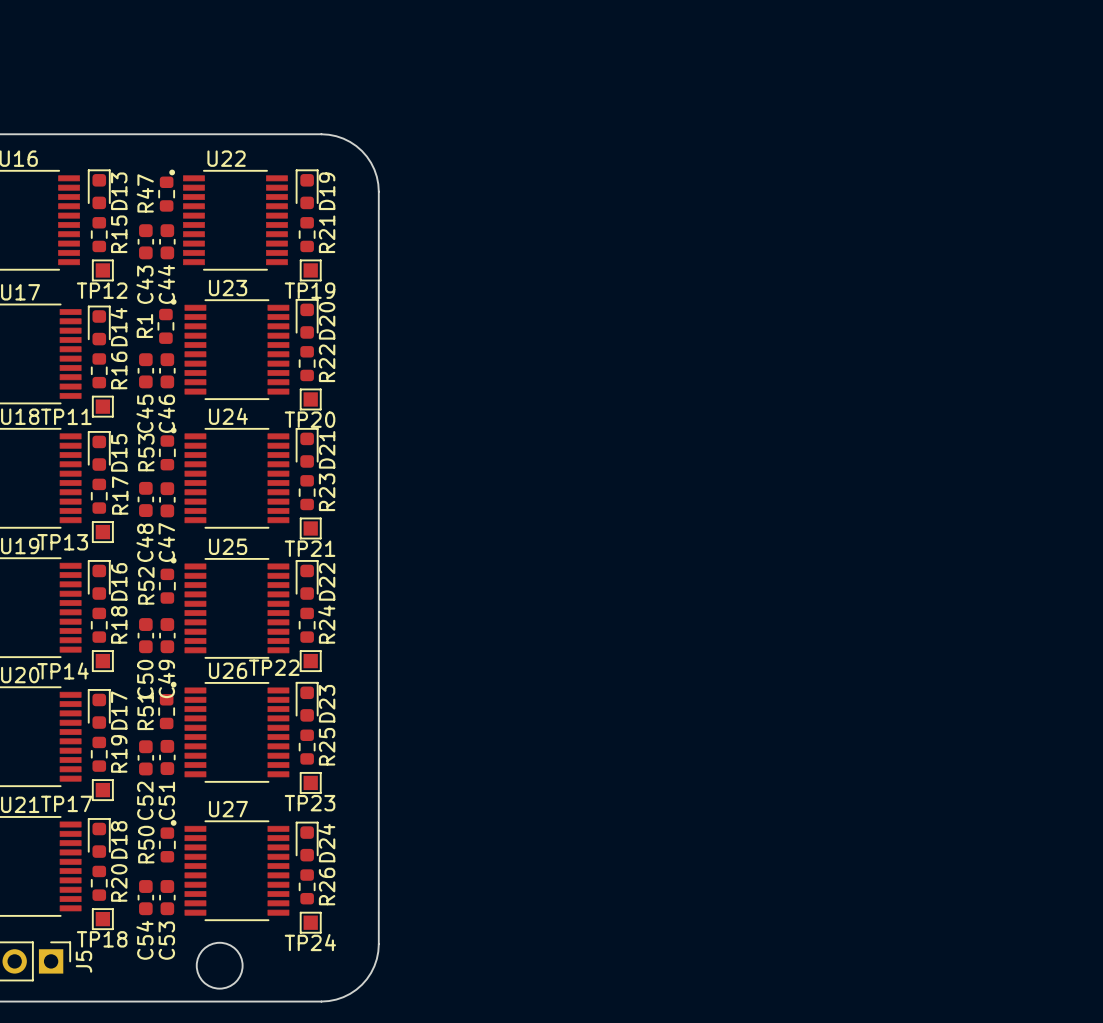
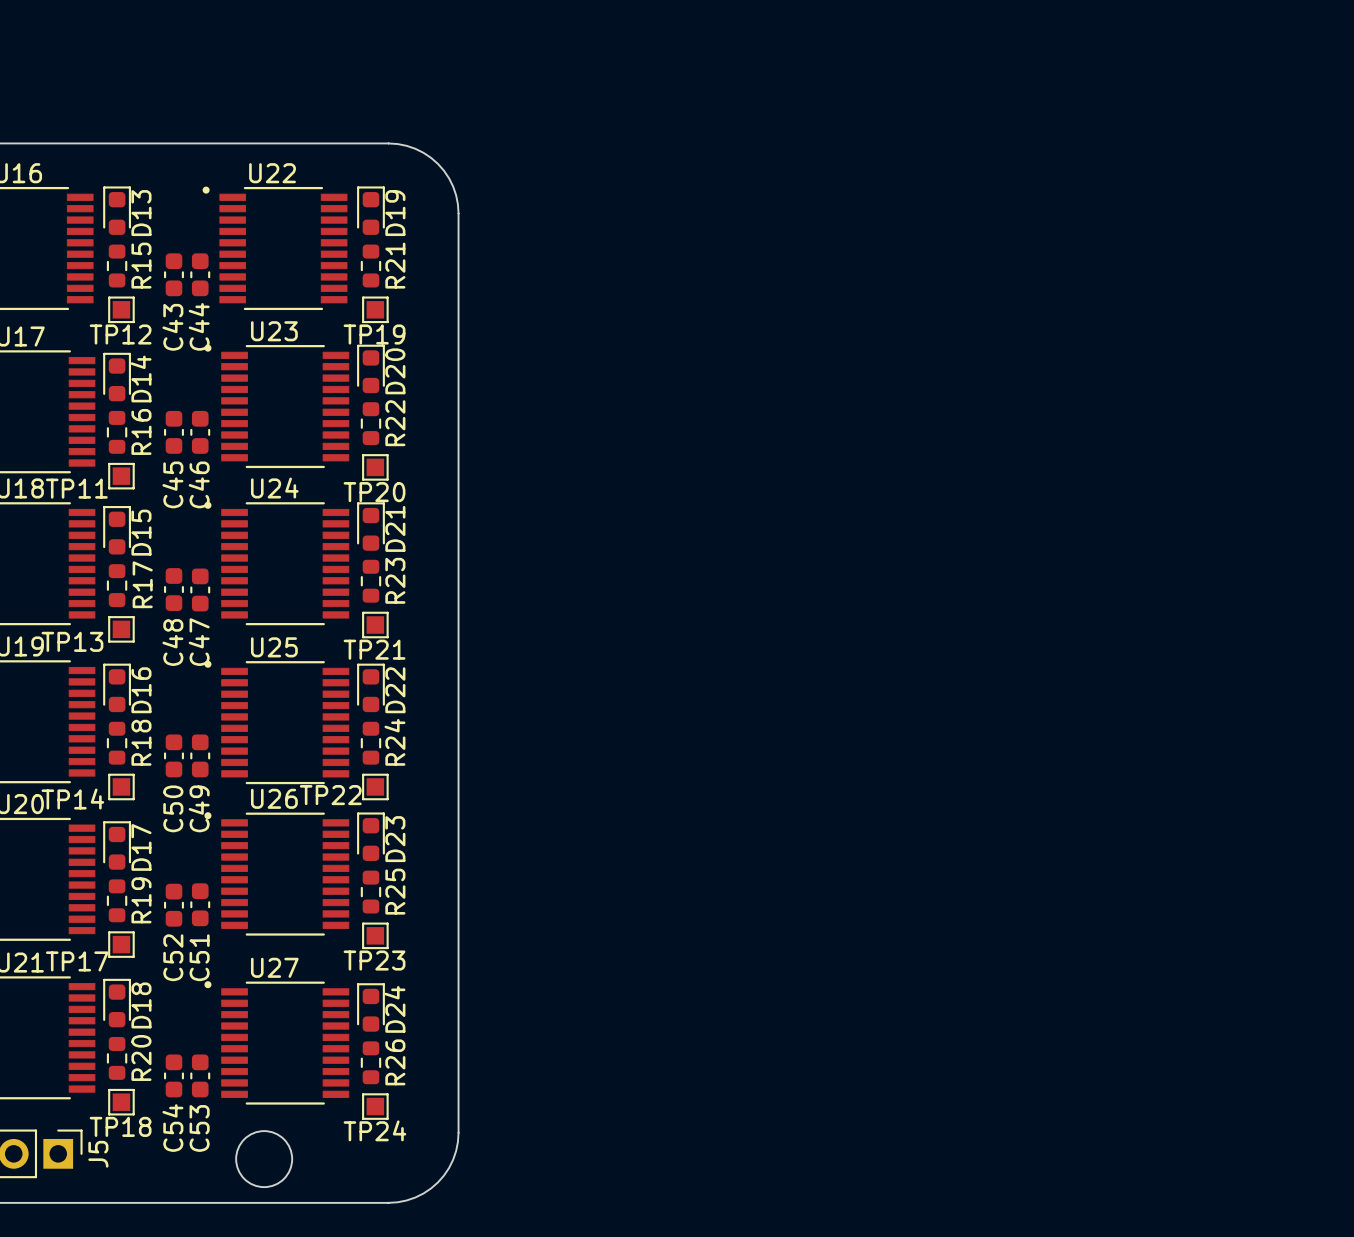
R47: (166, 194) -> none
R1: (165, 326) -> none
R53: (167, 452) -> none
R52: (167, 586) -> none
R51: (166, 711) -> none
R50: (167, 844) -> none

